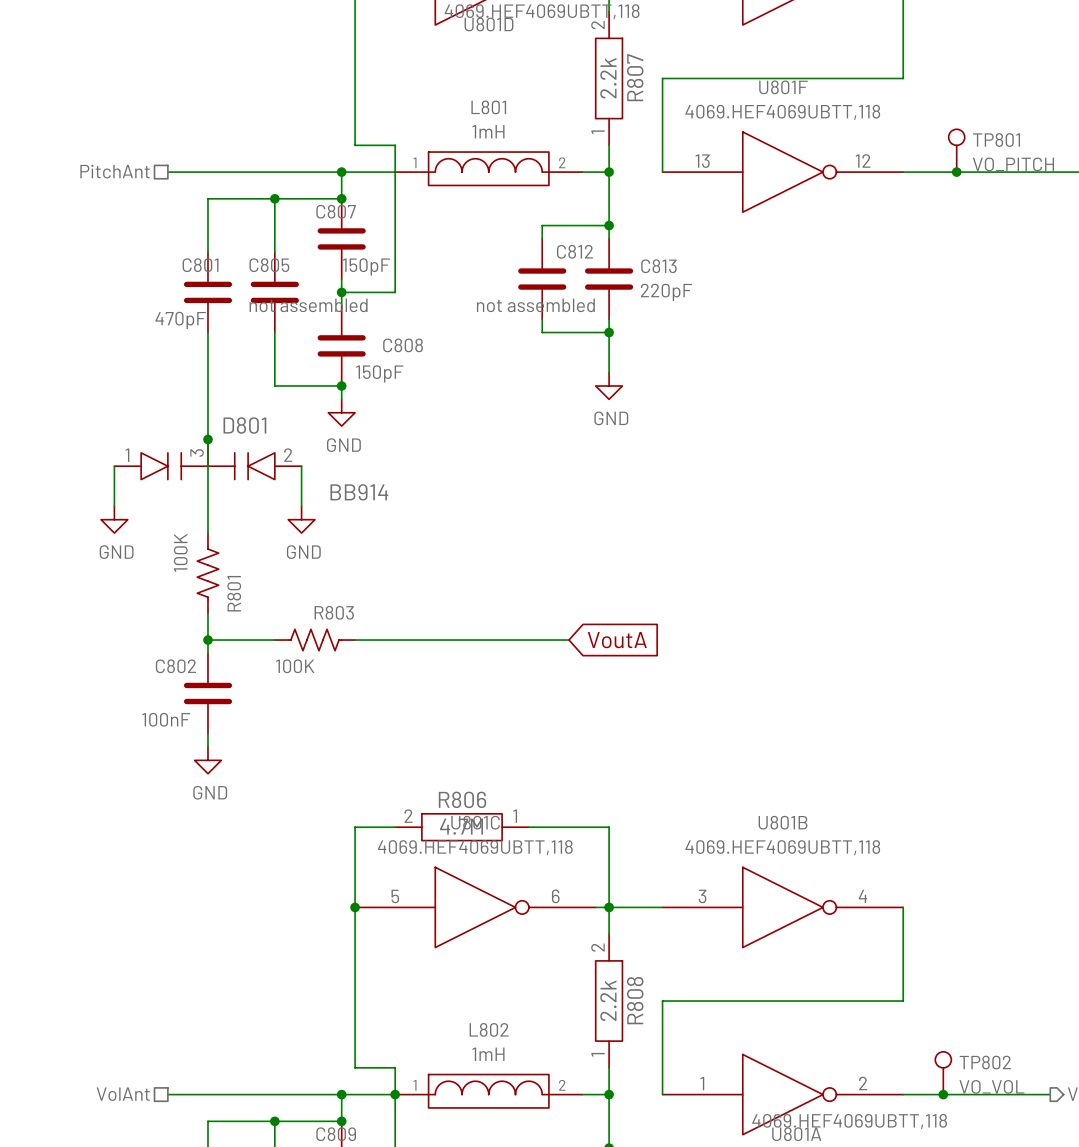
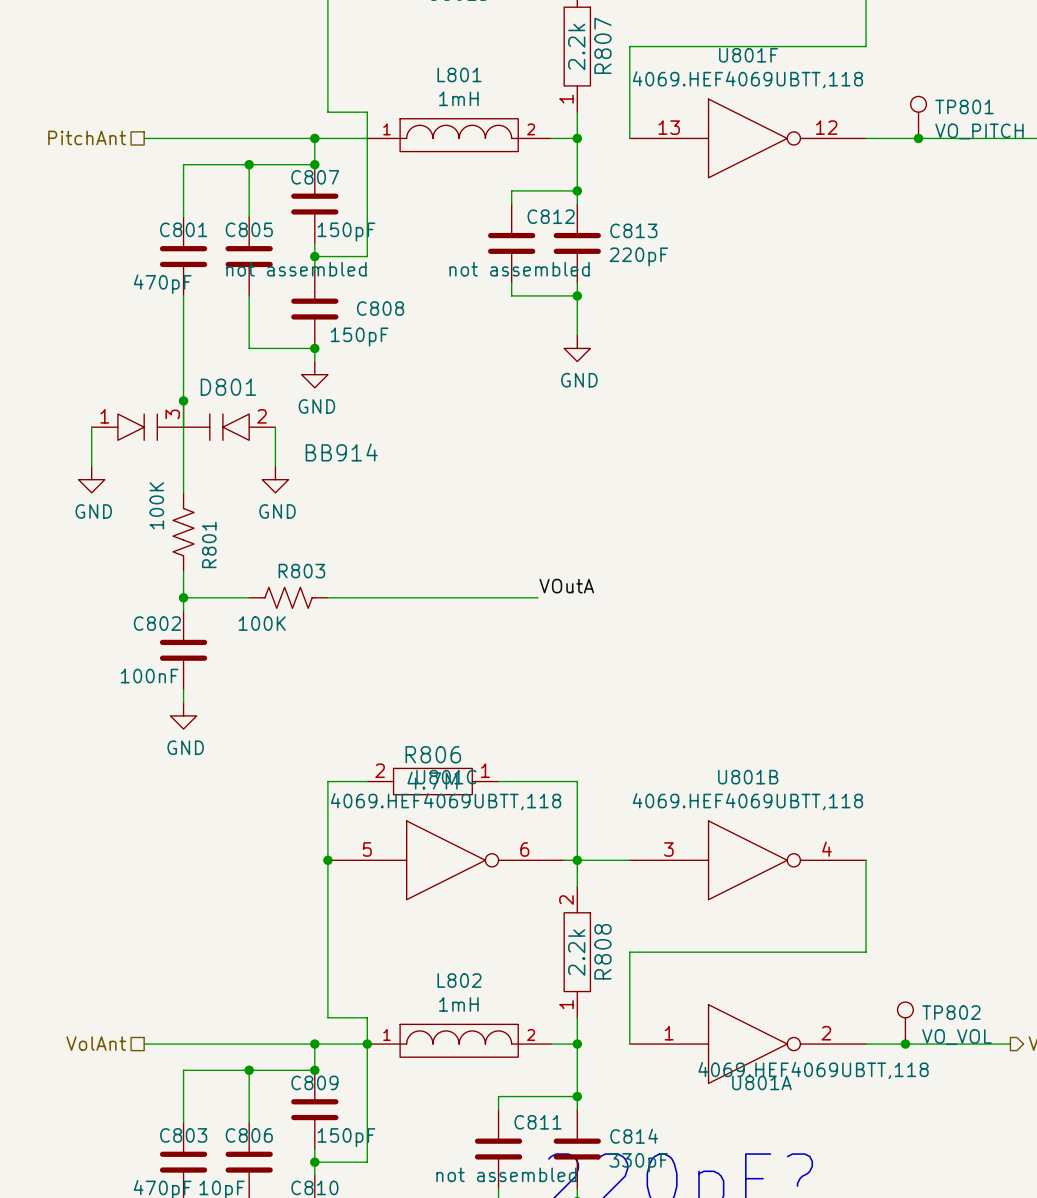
label: none -> VOutA (566, 586)
global label: VoutA (617, 640) -> none

